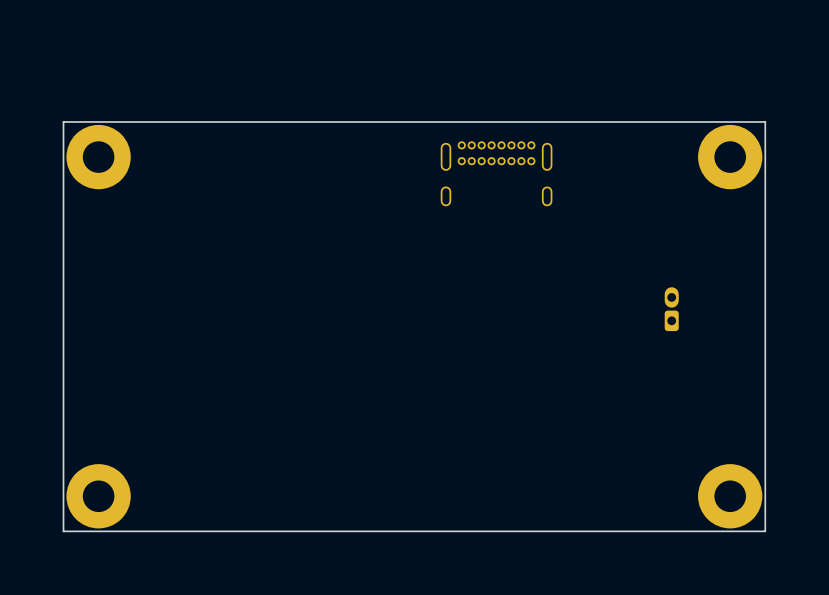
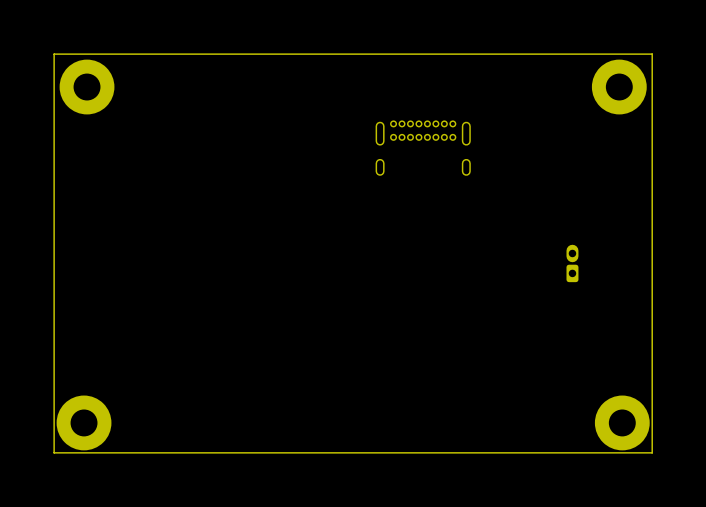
board edge: (765, 121) (63, 121) -> (652, 103) (652, 54) (54, 54) (54, 103)
part position: (98, 157) -> (87, 87)
part position: (730, 157) -> (619, 87)

